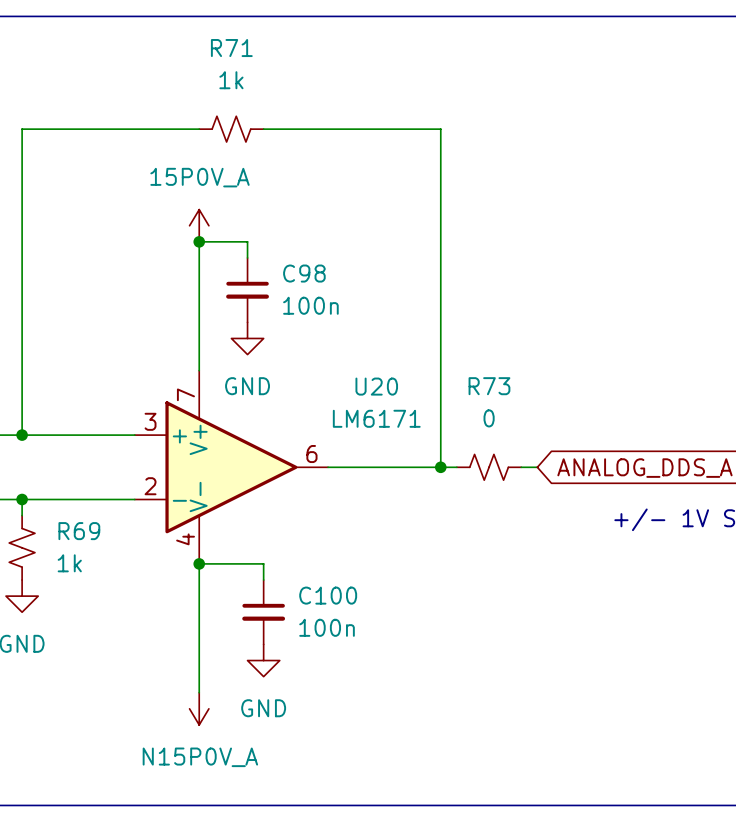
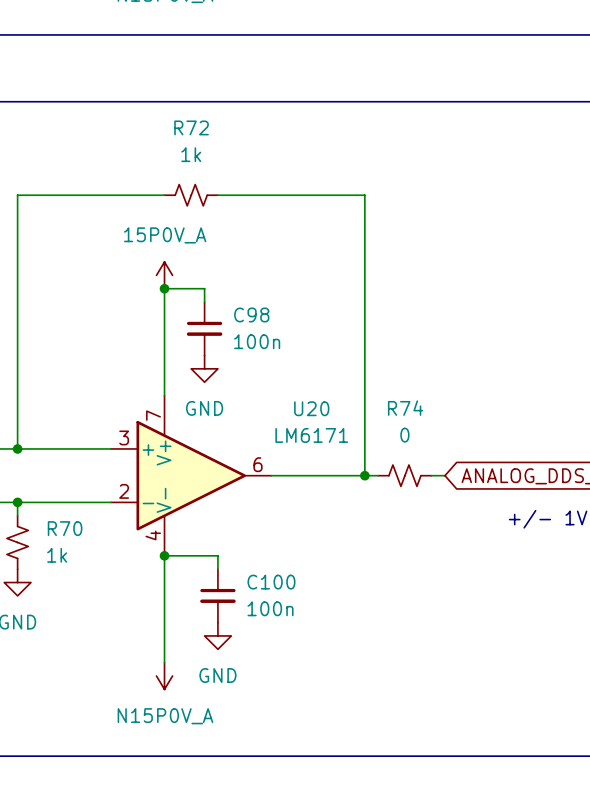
R71 name: R71 (231, 48) -> R72 (191, 127)
R73 name: R73 (489, 386) -> R74 (405, 408)
R69 name: R69 (79, 531) -> R70 (65, 528)

